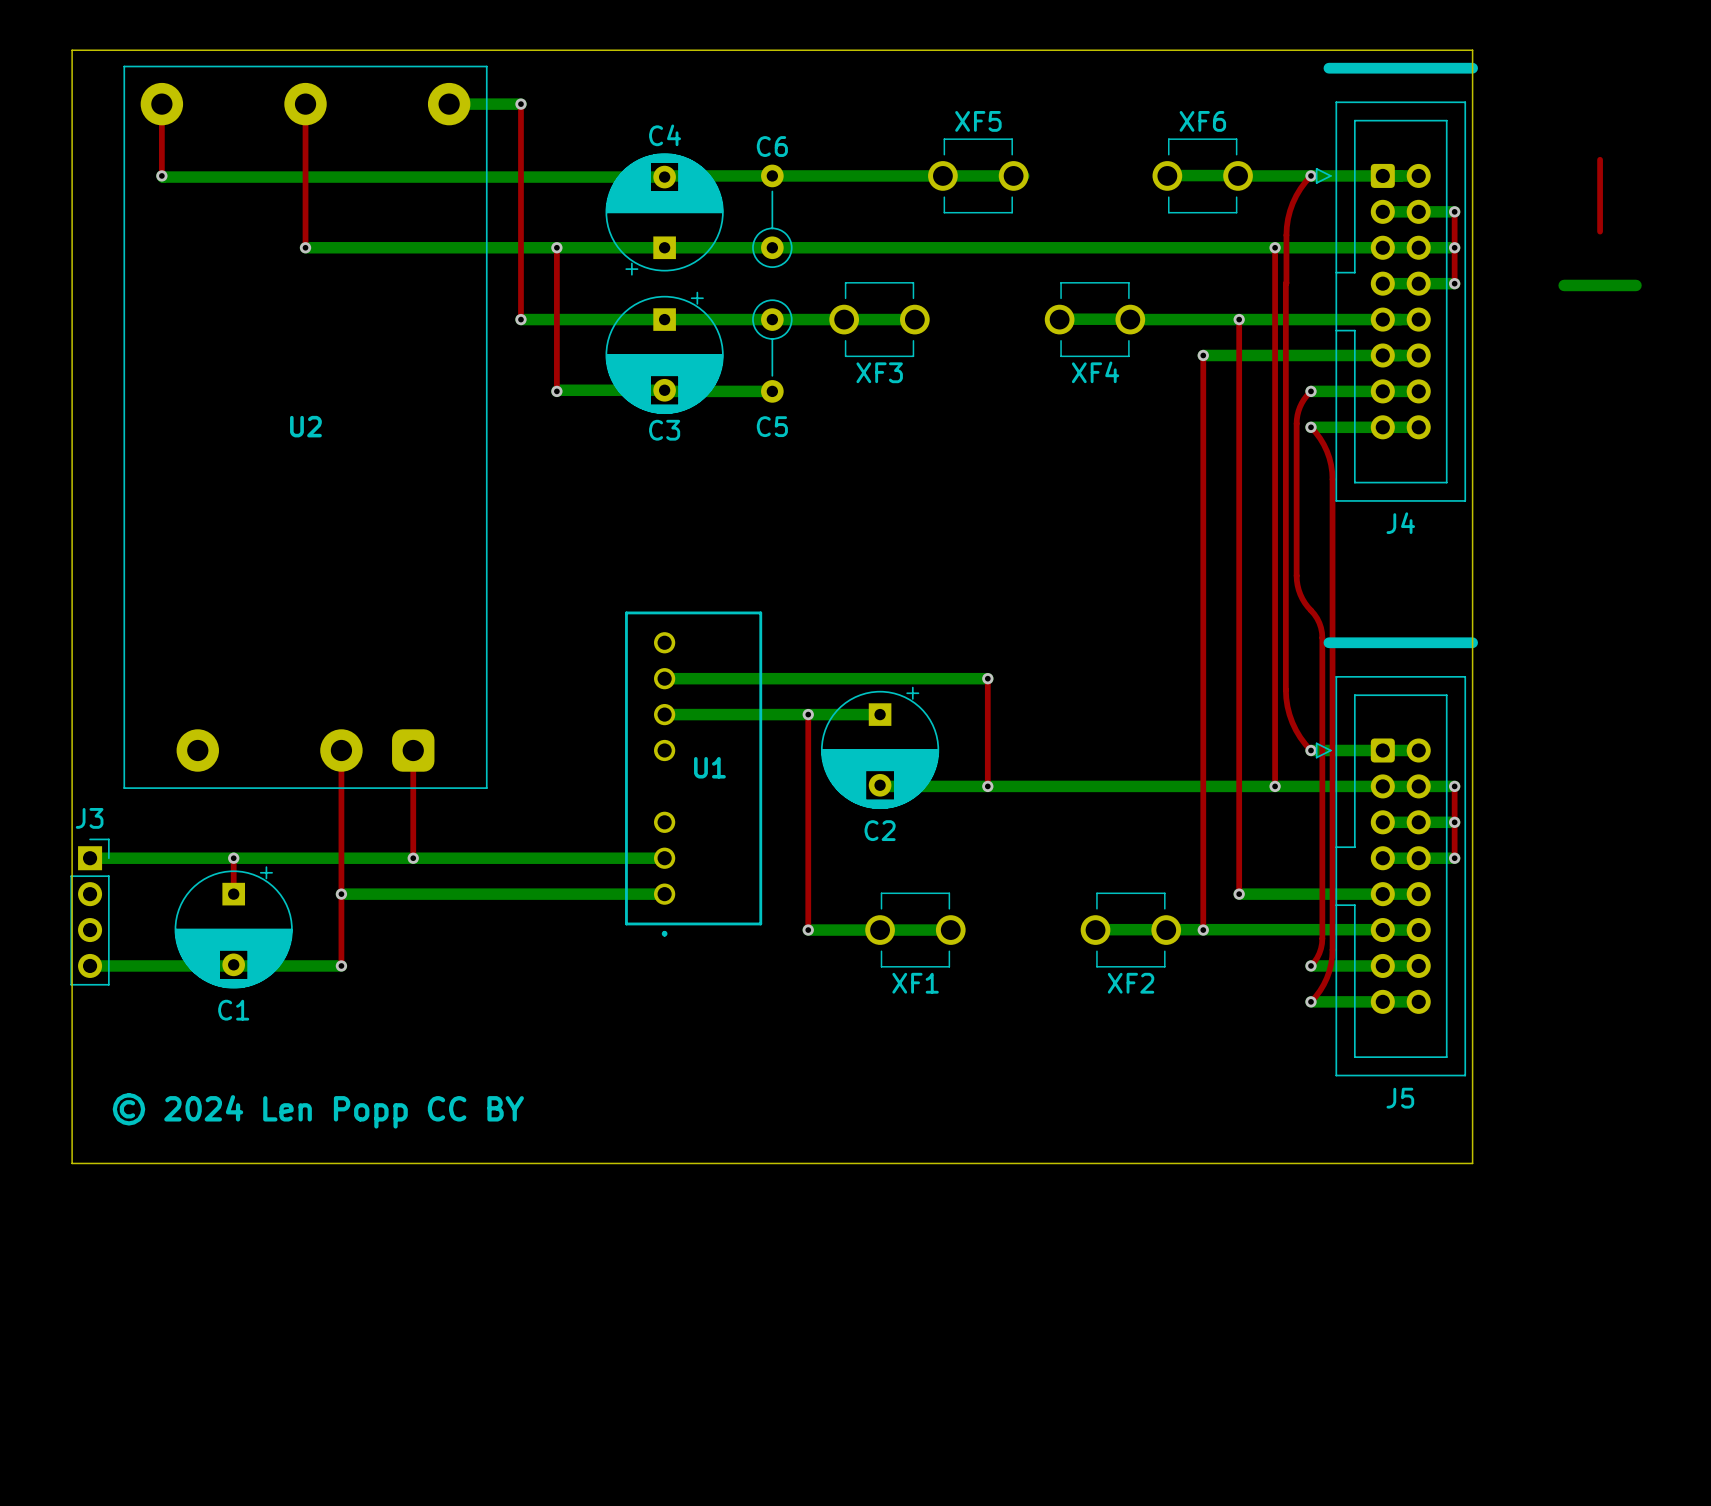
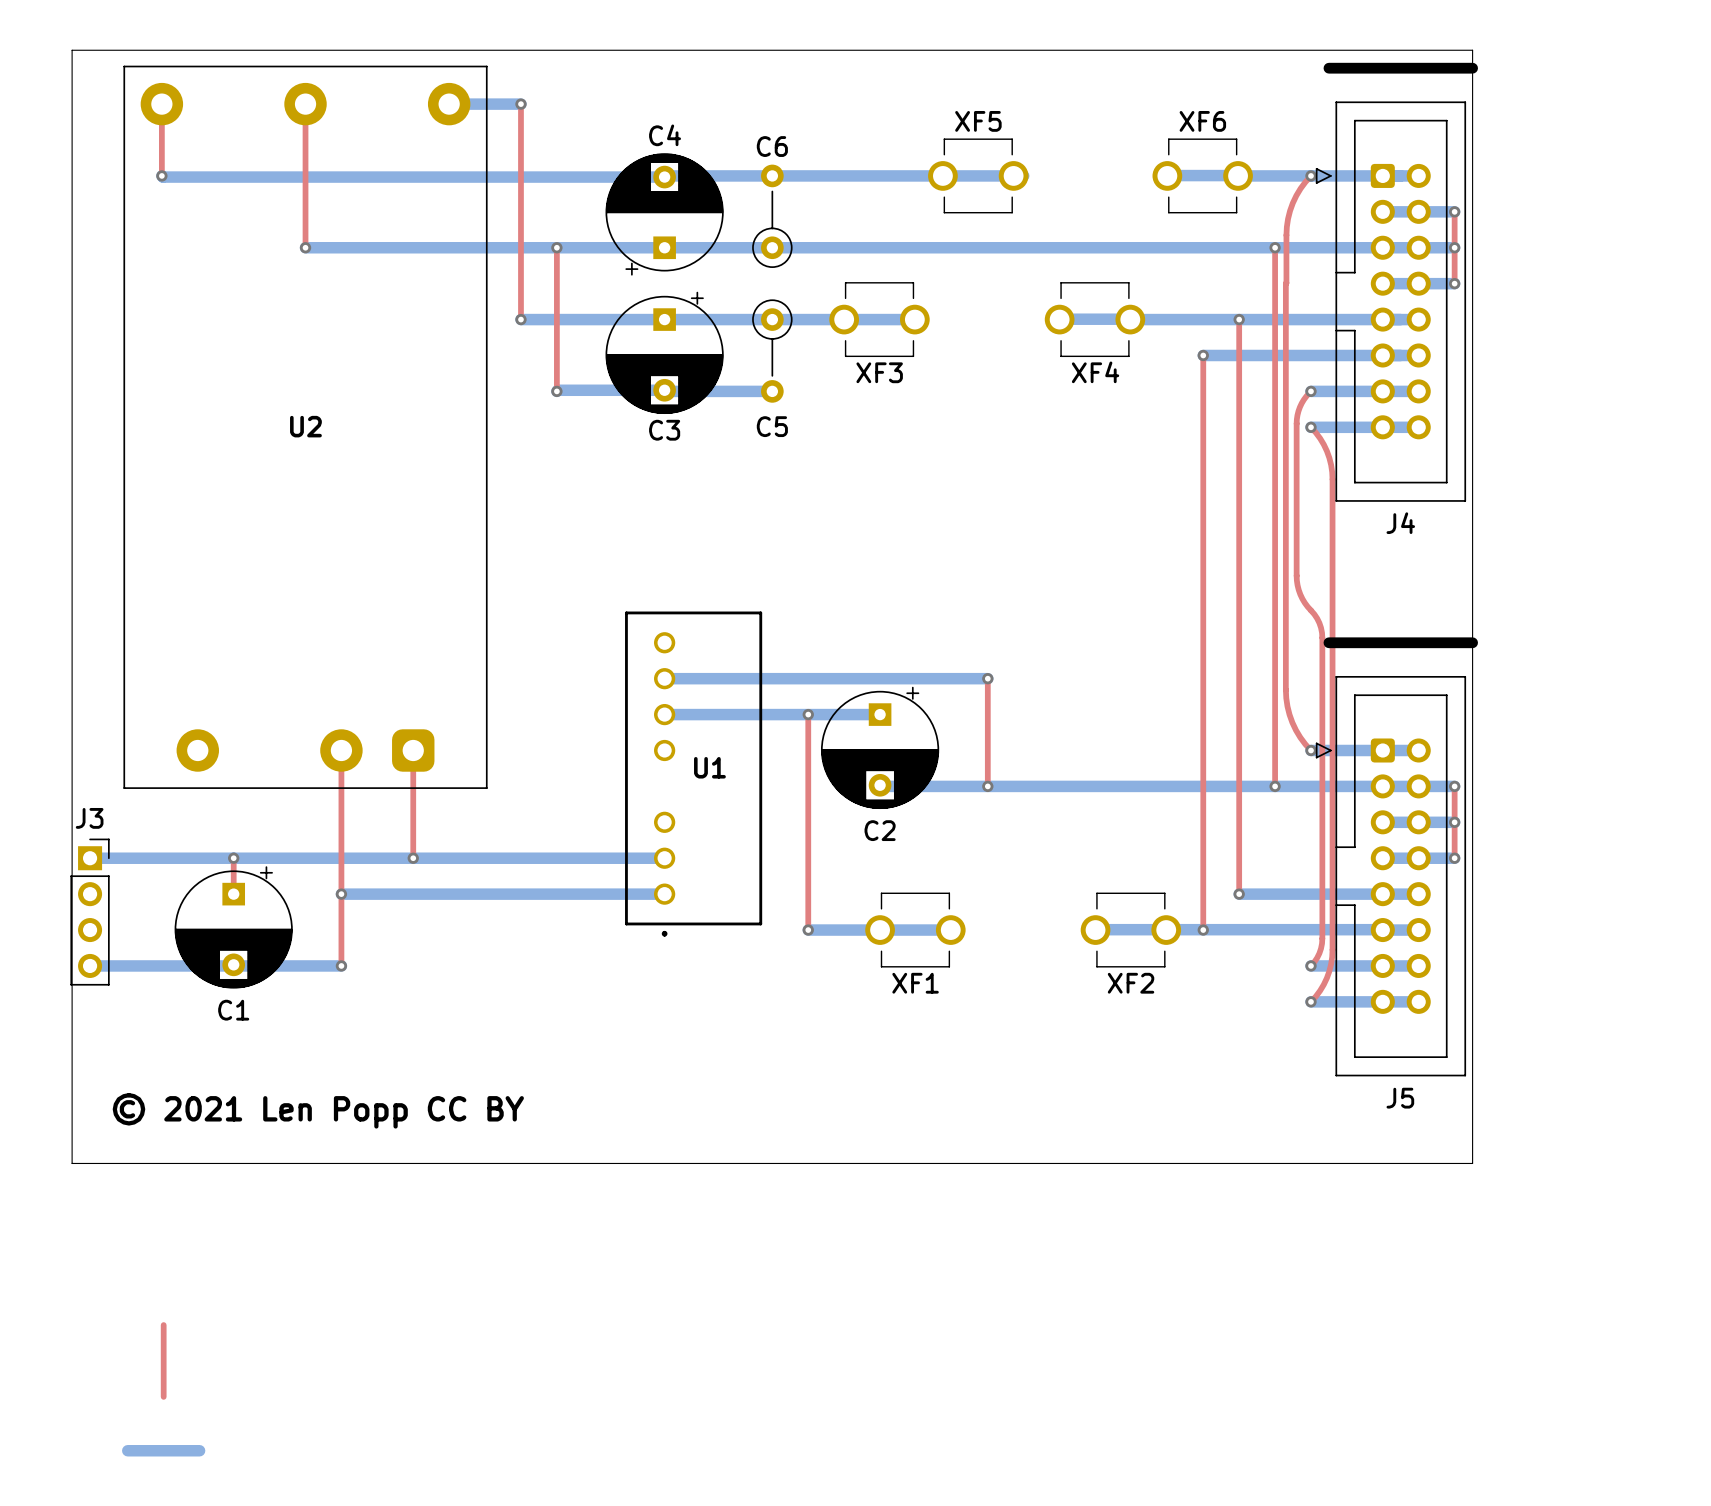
top track: (1600, 159) (1600, 231) -> none
bottom track: (1564, 285) (1635, 285) -> none
text: © 2024 Len Popp CC BY (318, 1110) -> © 2021 Len Popp CC BY (318, 1110)
top track: none -> (163, 1325) (163, 1396)
bottom track: none -> (127, 1450) (199, 1450)

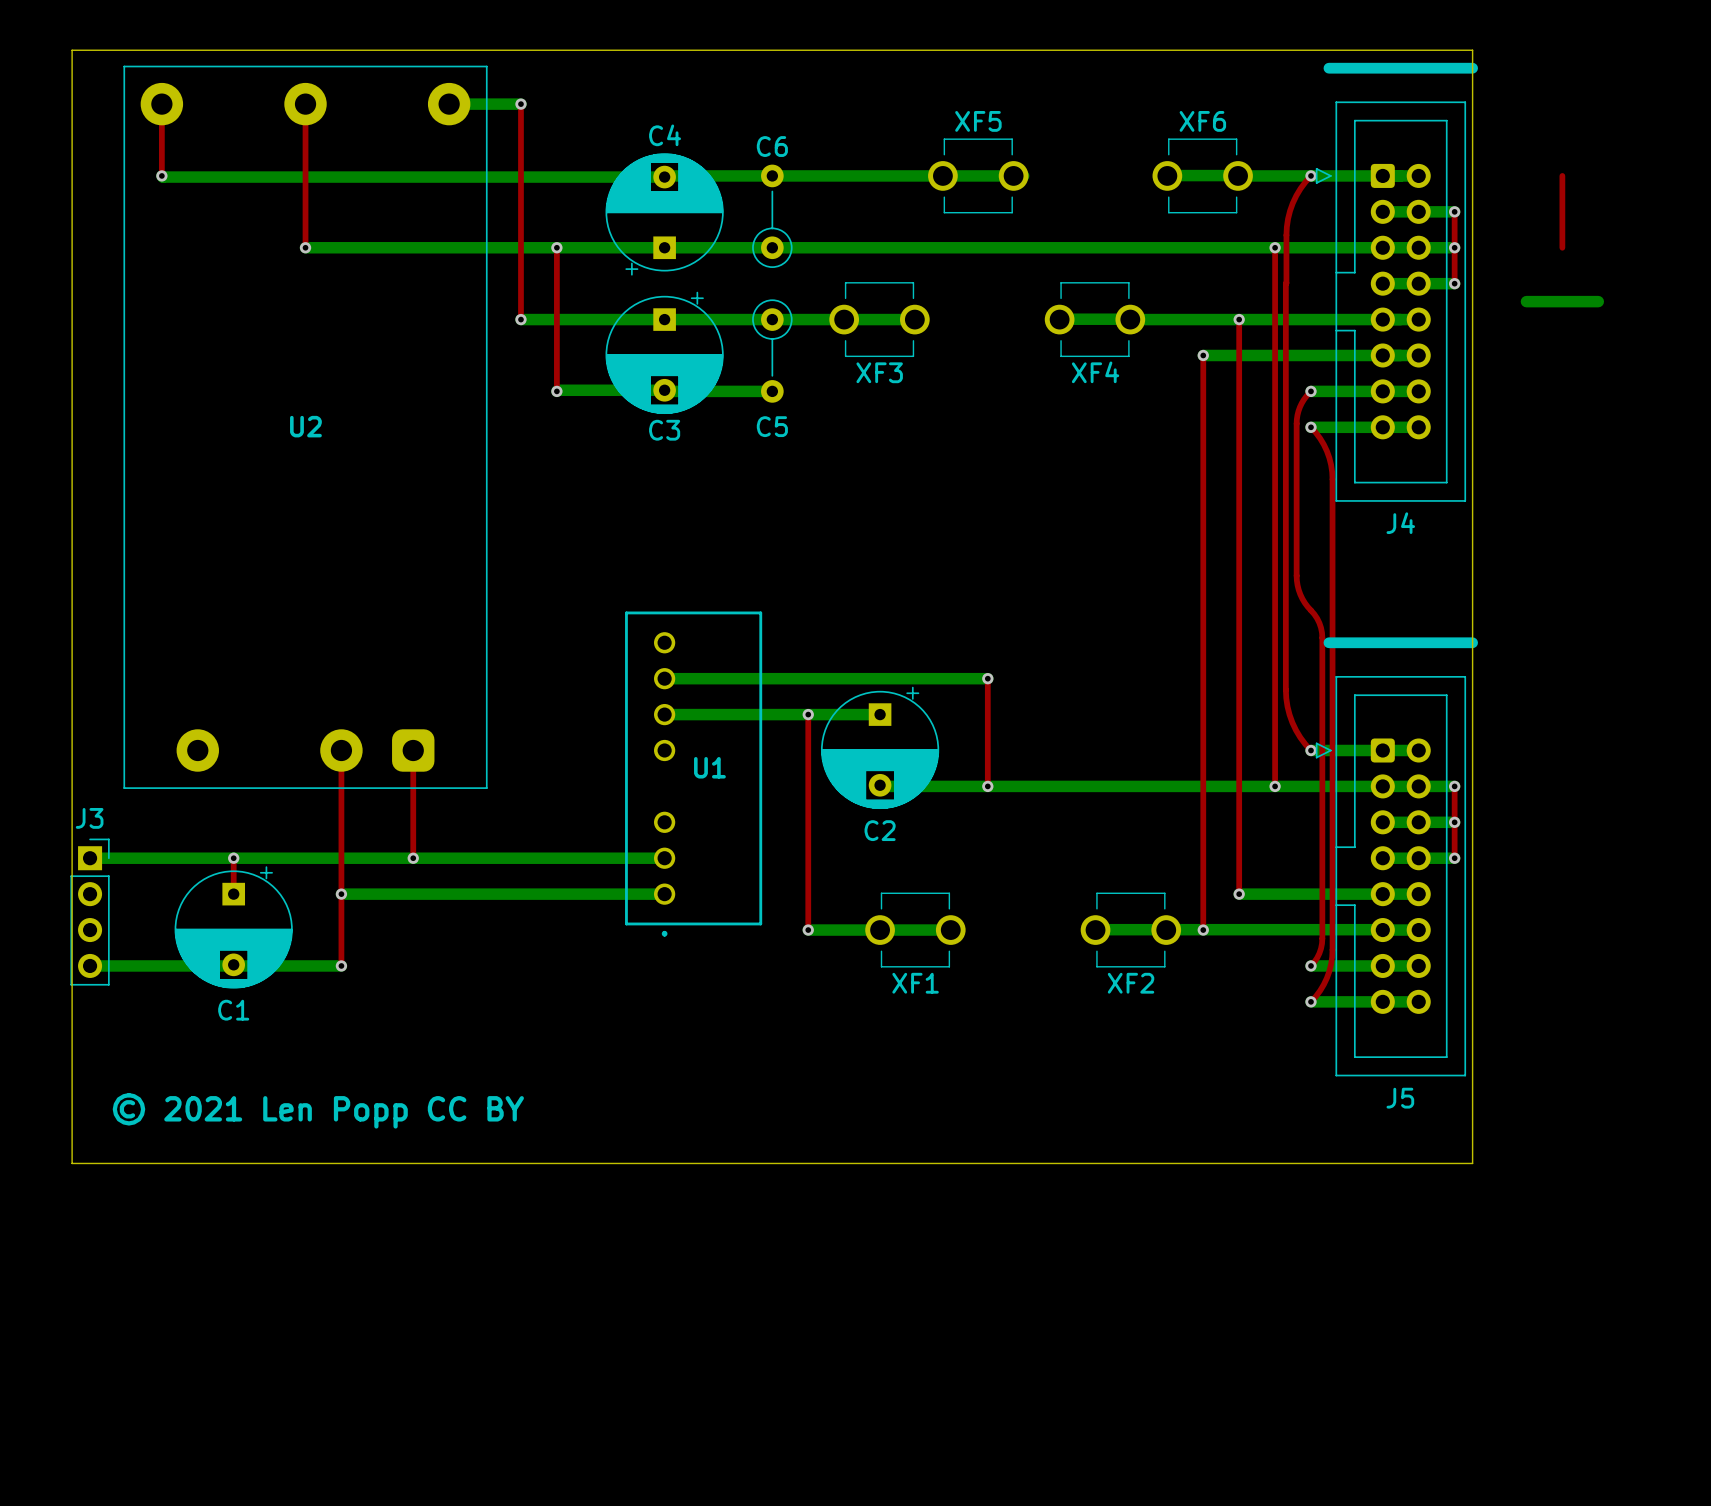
top track: none -> (1562, 175) (1562, 247)
bottom track: none -> (1526, 301) (1598, 301)
top track: (163, 1325) (163, 1396) -> none
bottom track: (127, 1450) (199, 1450) -> none

